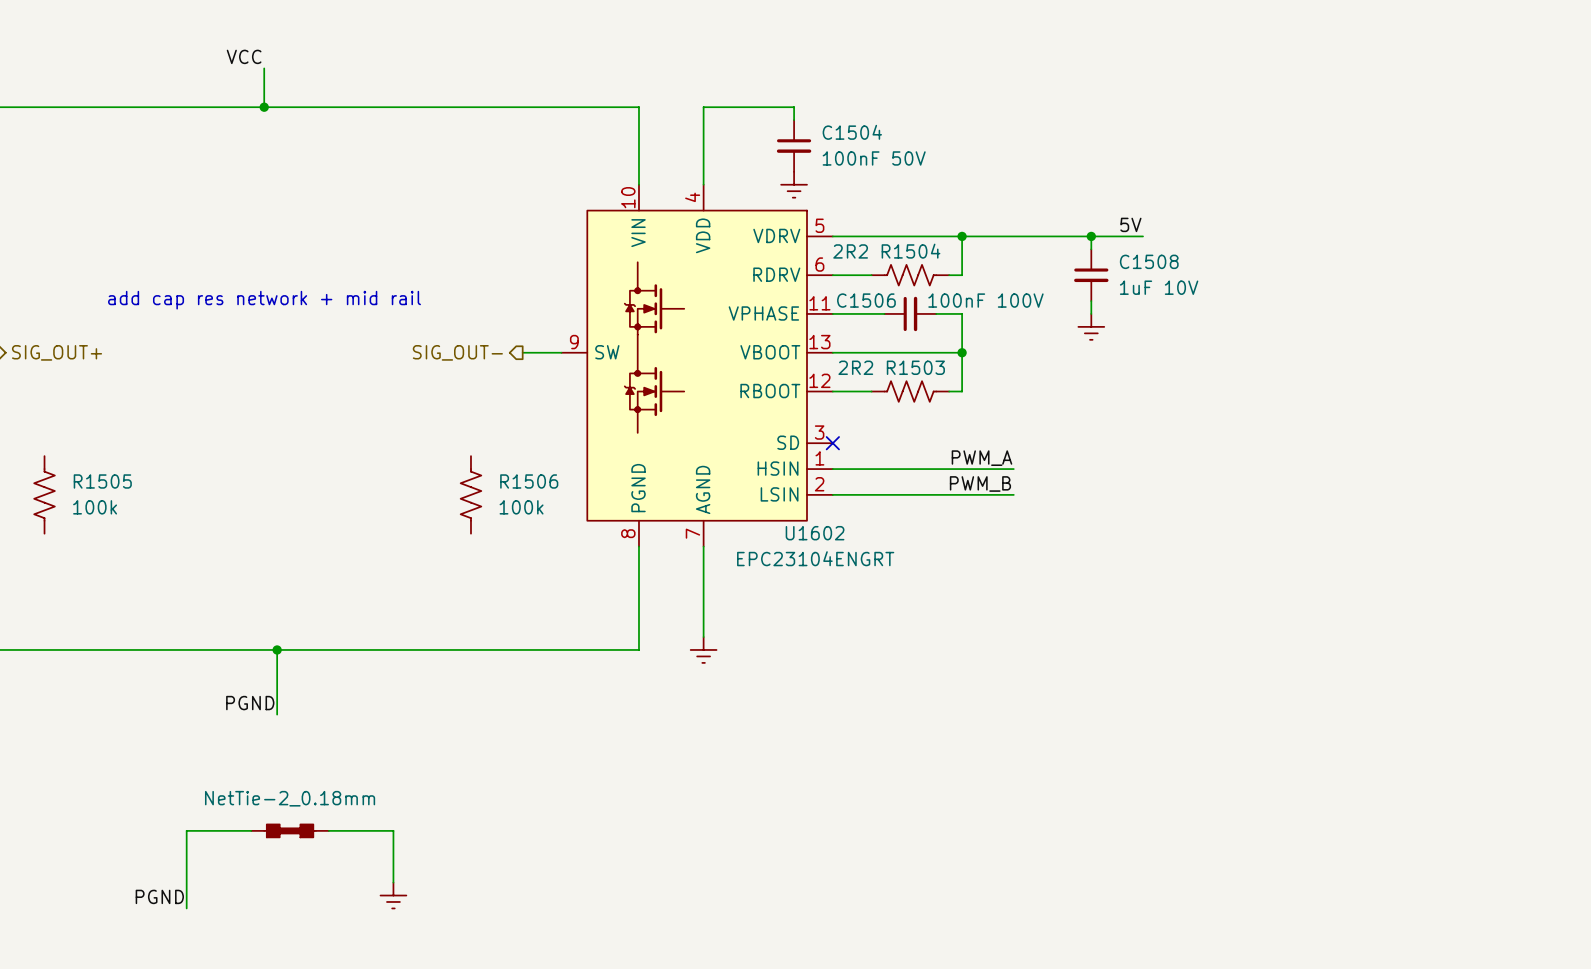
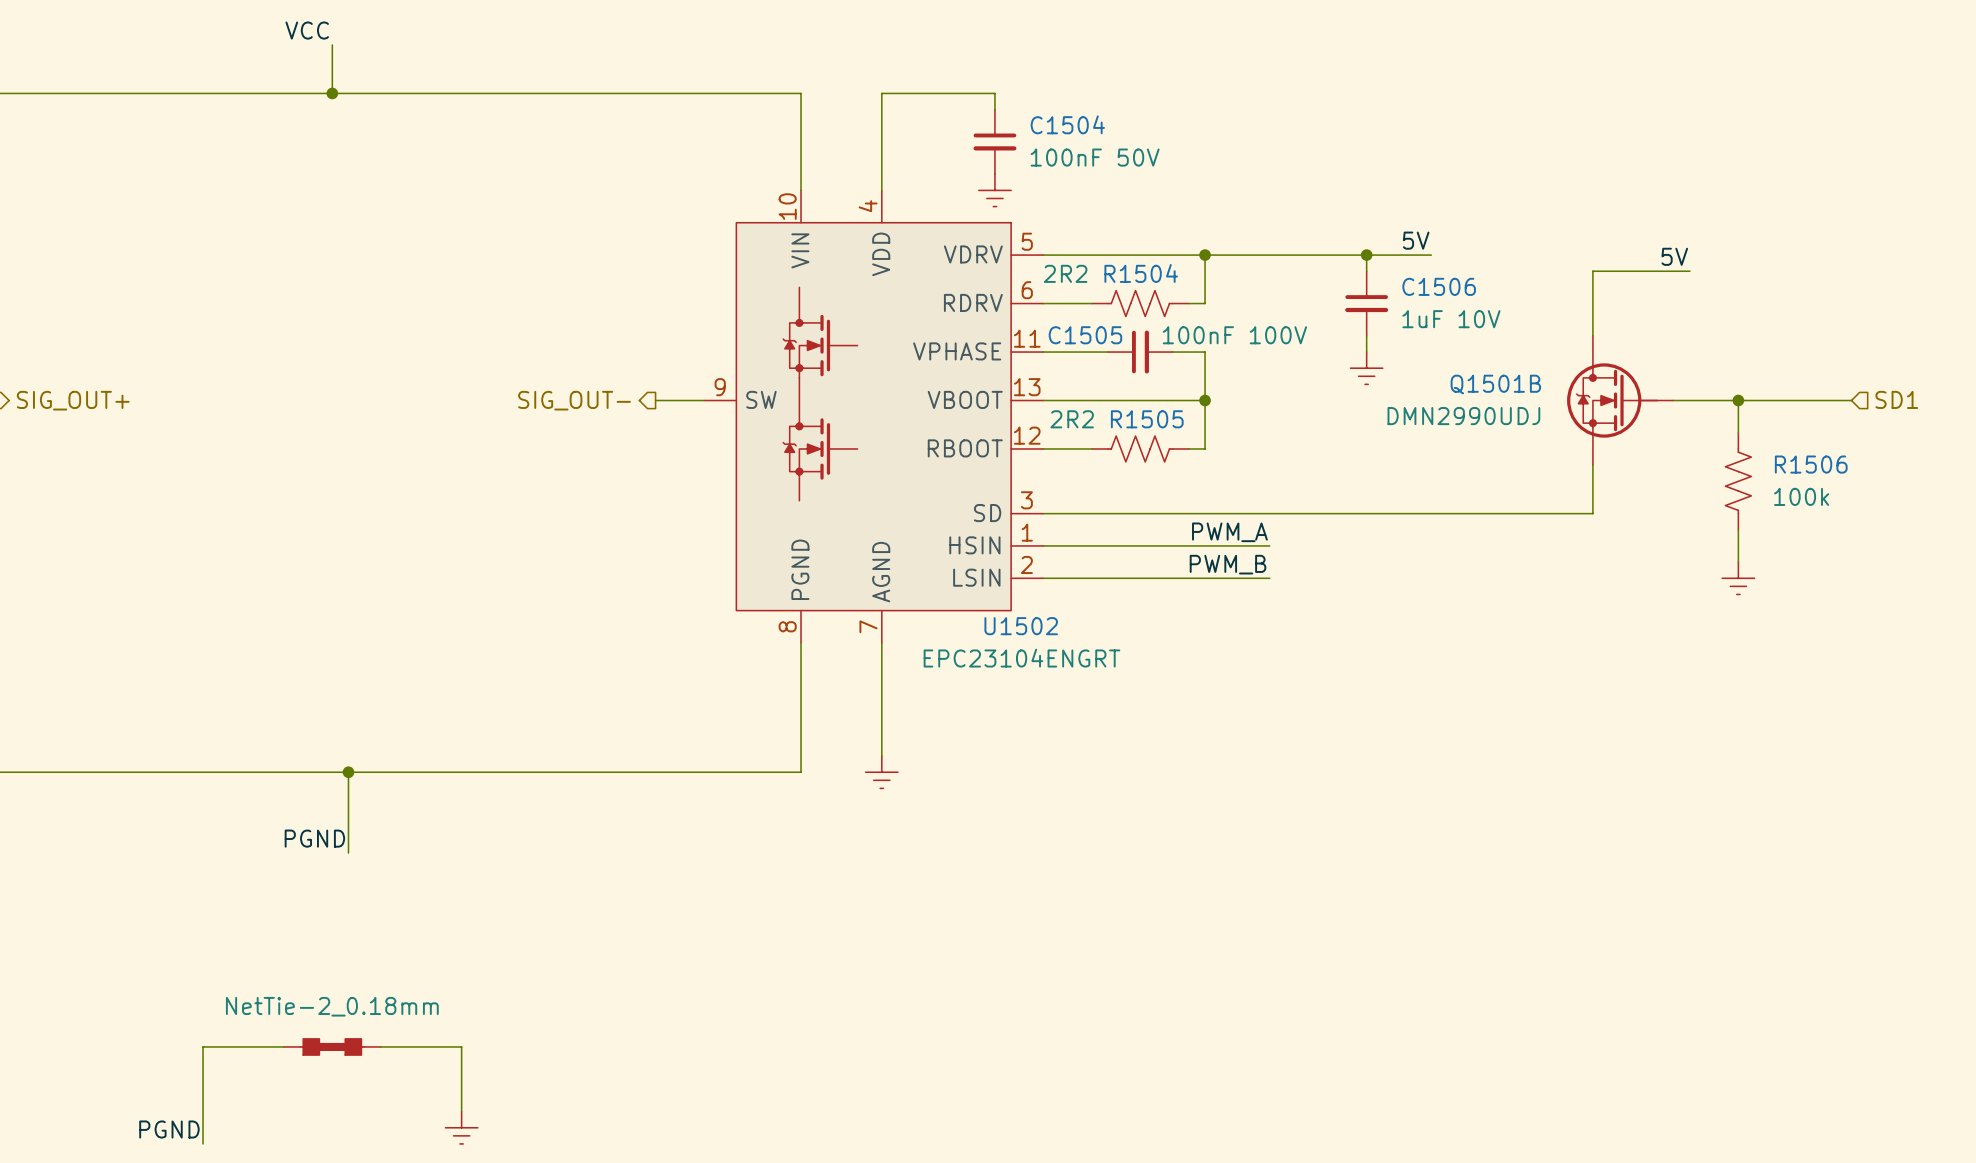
label: none -> 5V (1674, 256)
wire: none -> (1689, 271) (1592, 271) (1592, 335)
C1508 name: C1508 (1149, 261) -> C1506 (1439, 286)
text: add cap res network + mid rail (264, 300) -> none
C1506 name: C1506 (866, 300) -> C1505 (1085, 335)
Q1501B: none -> DMN2990UDJ (1620, 400)
wire: none -> (1673, 400) (1851, 400)
wire: none -> (1738, 400) (1738, 432)
junction: none -> (1738, 400)
hierarchical label: none -> SD1 (1896, 399)
R1503 name: R1503 (915, 367) -> R1505 (1147, 419)
wire: none -> (1592, 465) (1592, 513) (1043, 513)
no-connect mark: (832, 443) -> none
wire: none -> (1738, 529) (1738, 562)
R1505: 100k (44, 494) -> none
R1506 position: (470, 494) -> (1738, 481)
power symbol: none -> (1738, 578)
U1602 name: U1602 (815, 533) -> U1502 (1021, 626)
wire: (251, 830) (186, 830) (186, 908) -> (283, 1046) (203, 1046) (203, 1143)
part position: (290, 830) -> (332, 1046)
wire: (328, 830) (393, 830) (393, 882) -> (380, 1046) (461, 1046) (461, 1111)
power symbol position: (393, 895) -> (461, 1127)
label position: PGND (159, 896) -> PGND (169, 1129)

